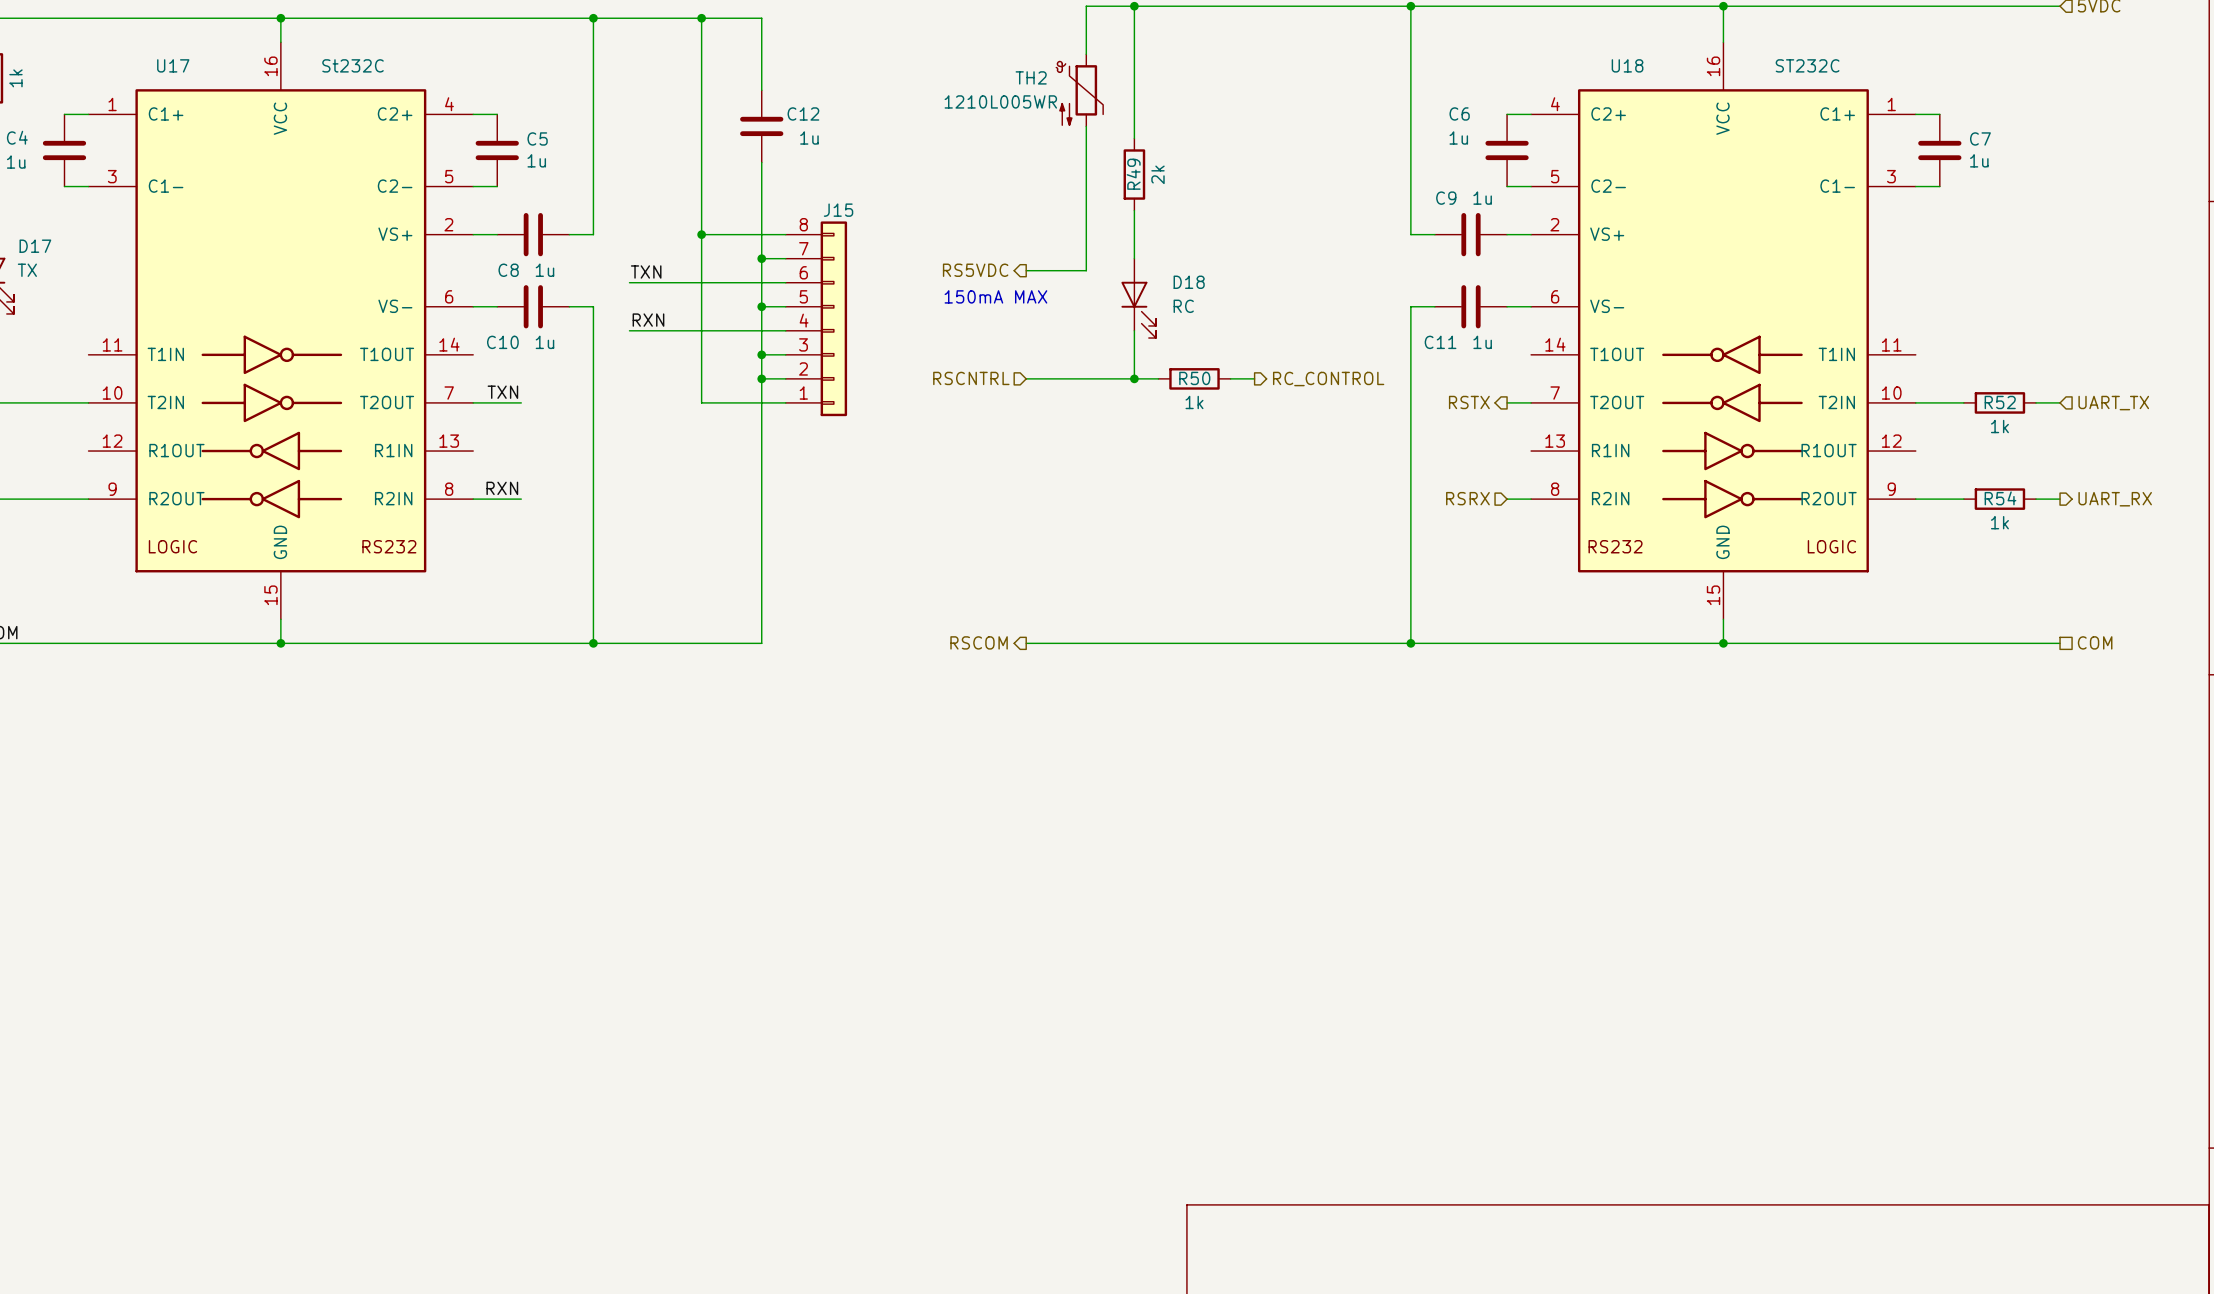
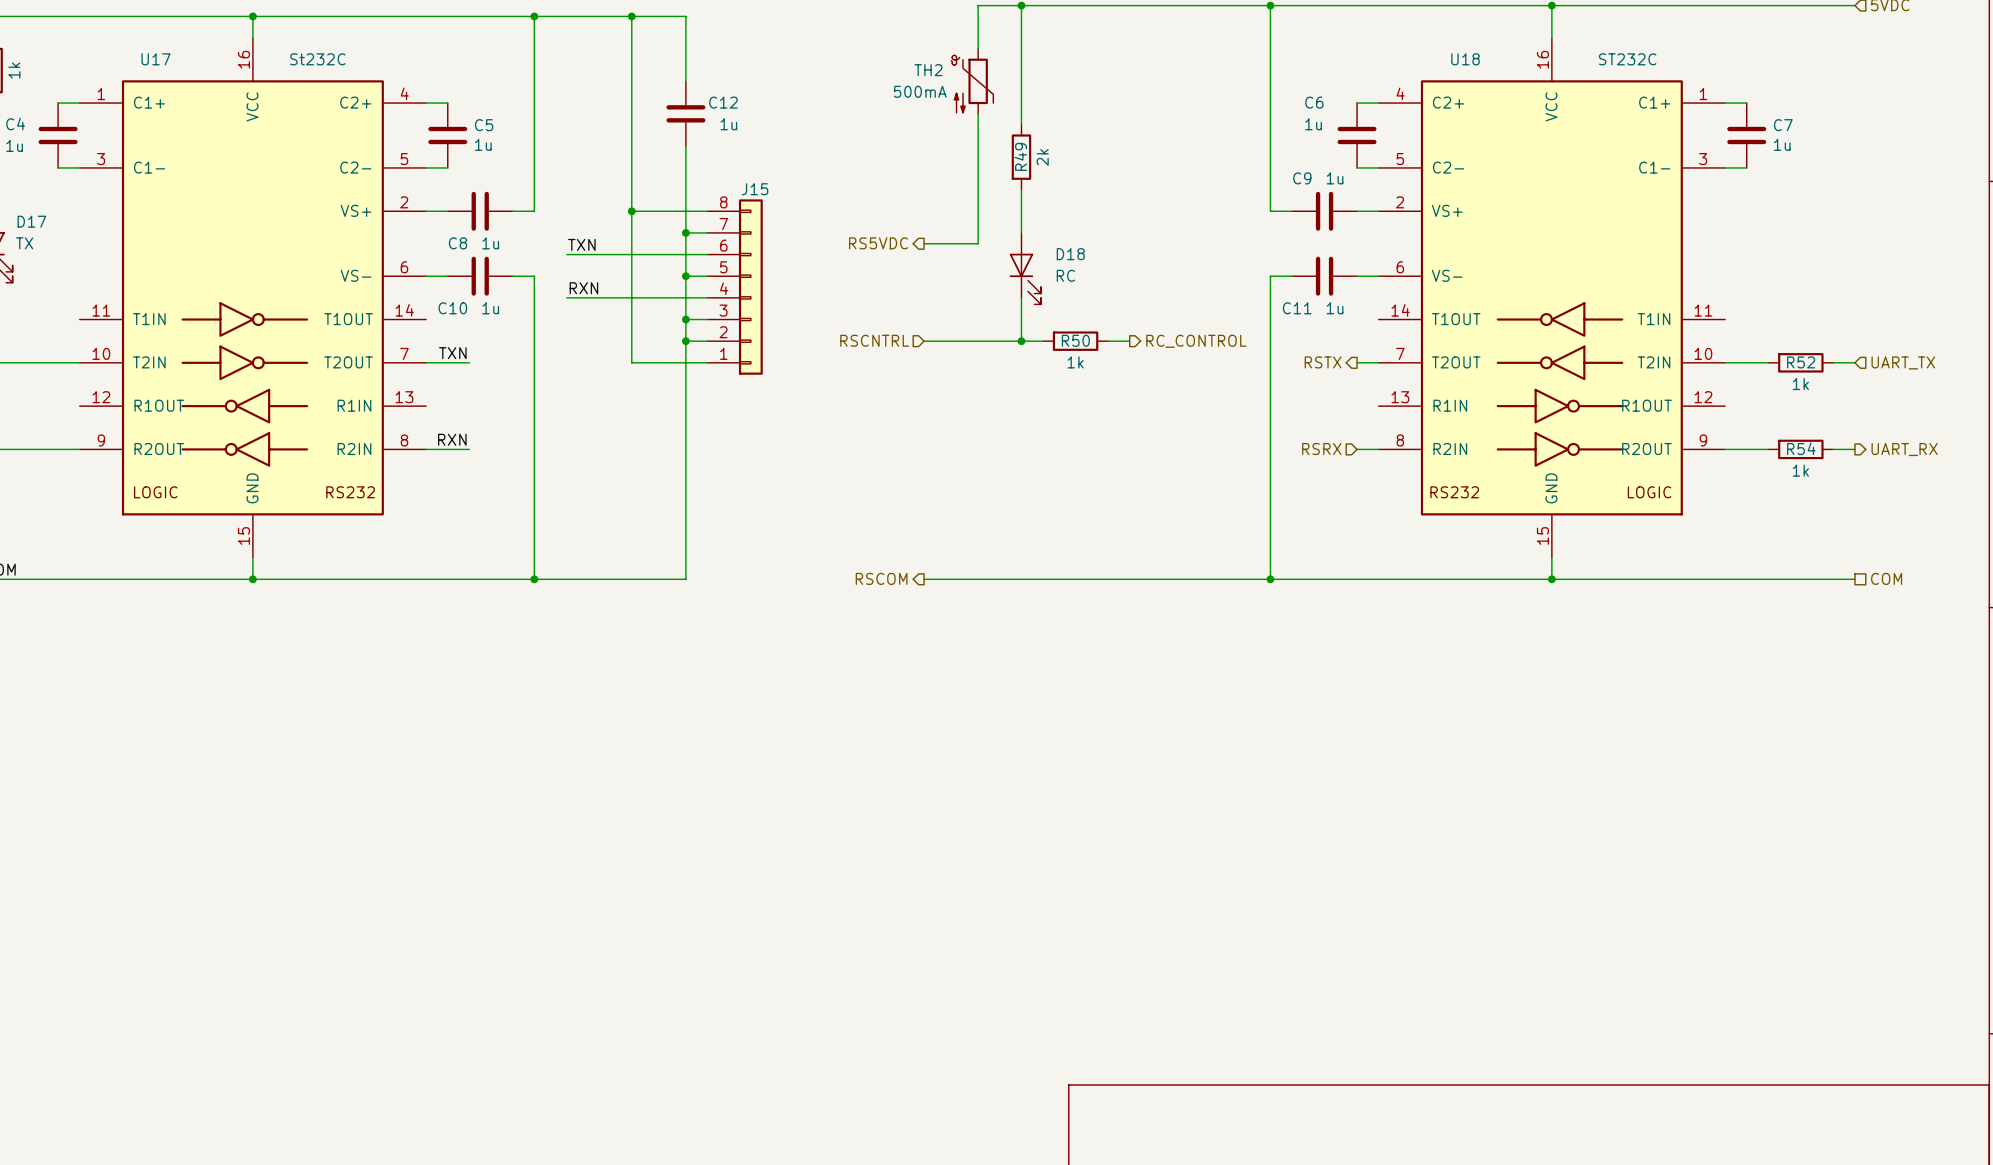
TH2 value: 1210L005WR (1000, 101) -> 500mA (920, 91)
text: 150mA MAX (995, 296) -> none

